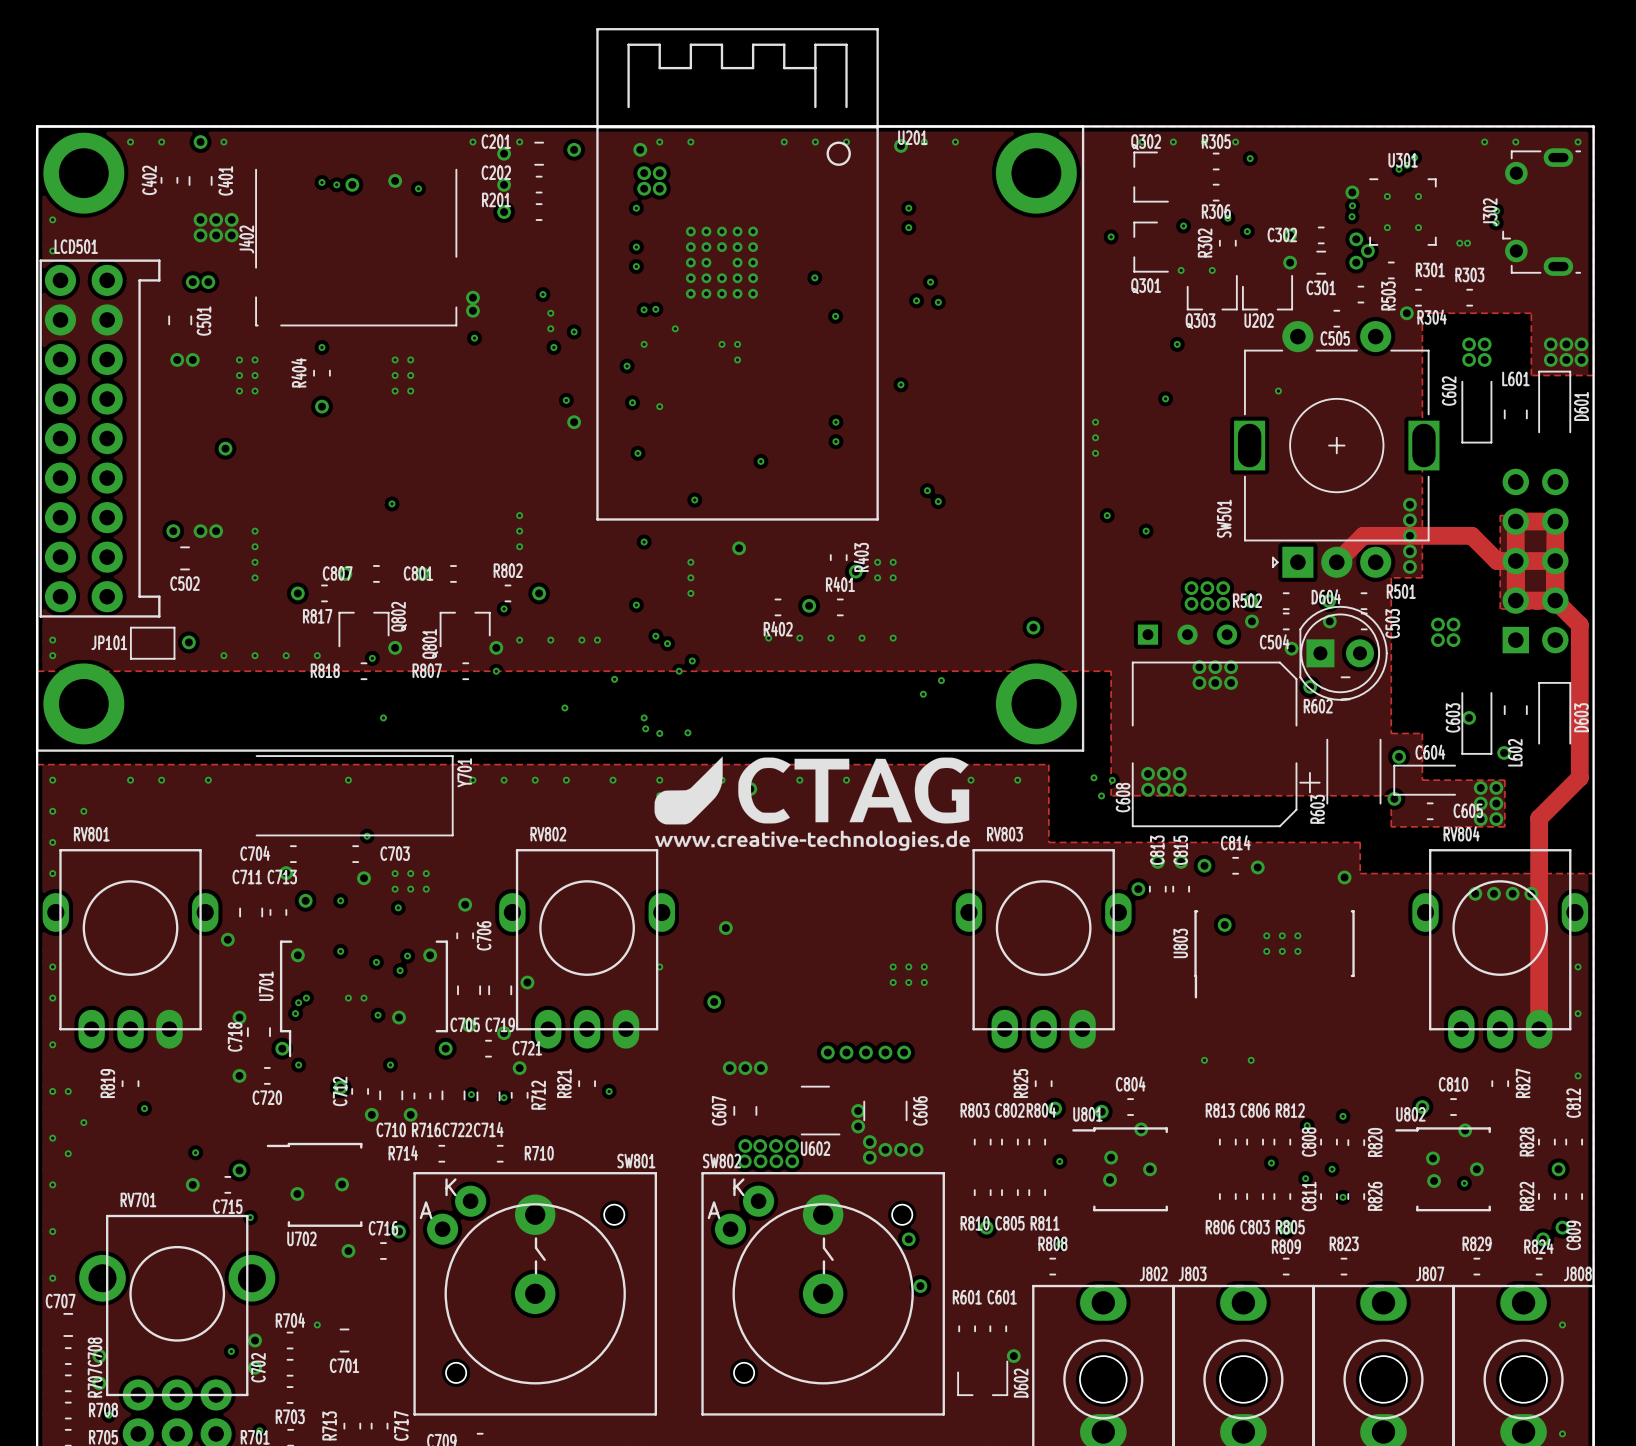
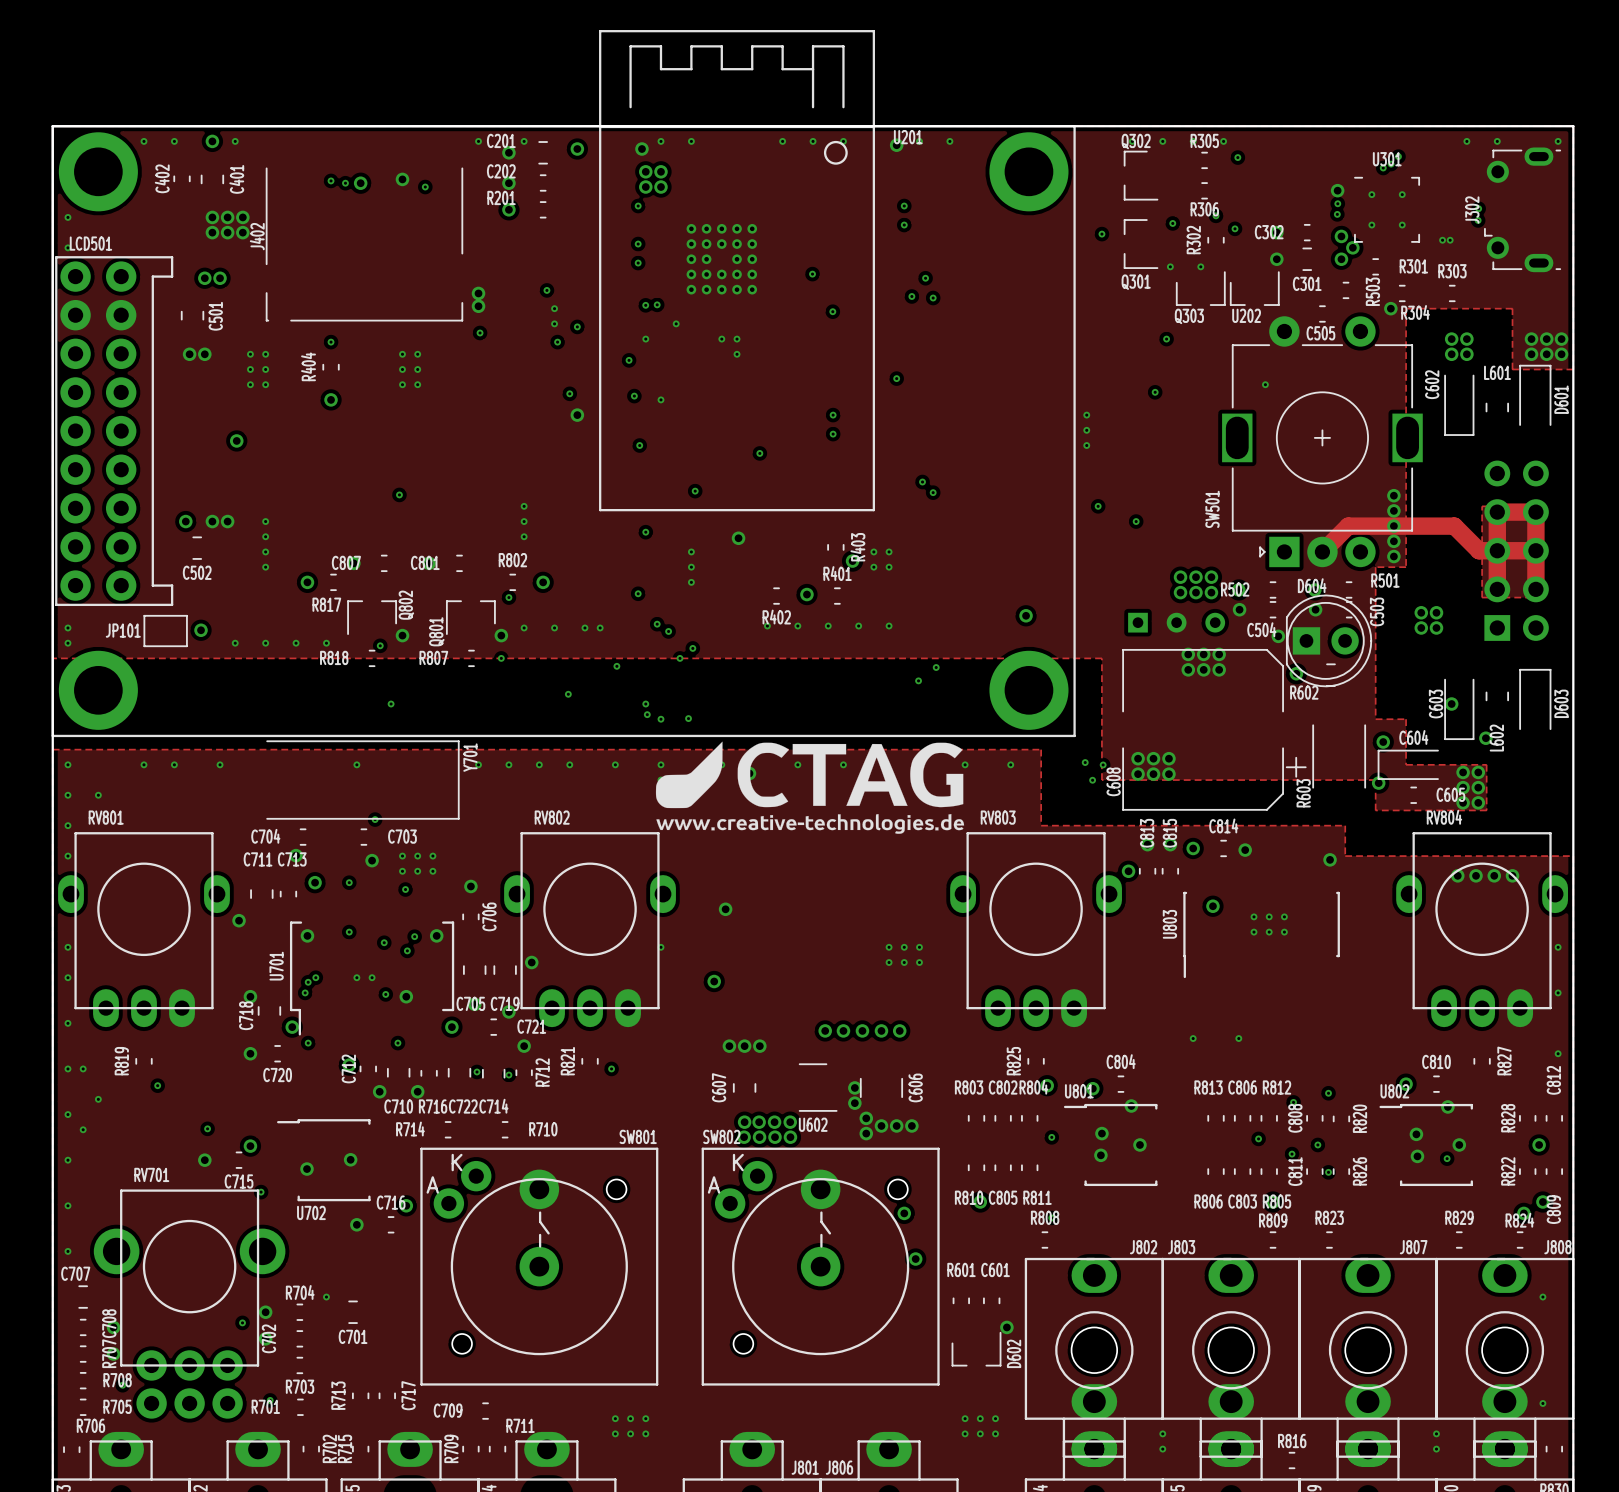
track: (1515, 600) (1555, 600) (1579, 625) (1579, 777) (1539, 818) (1539, 1029) -> none

